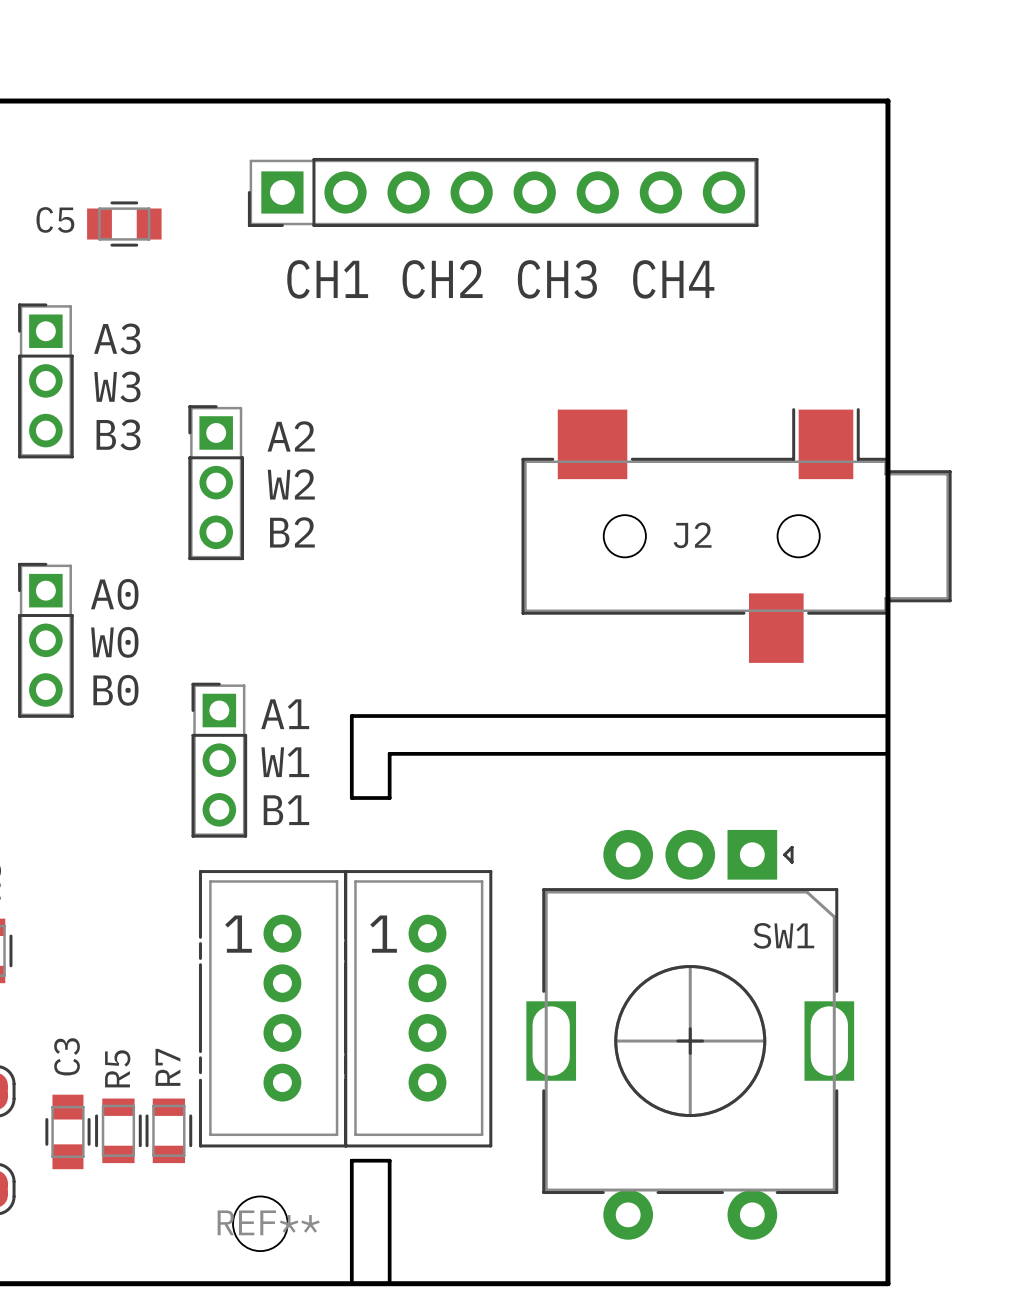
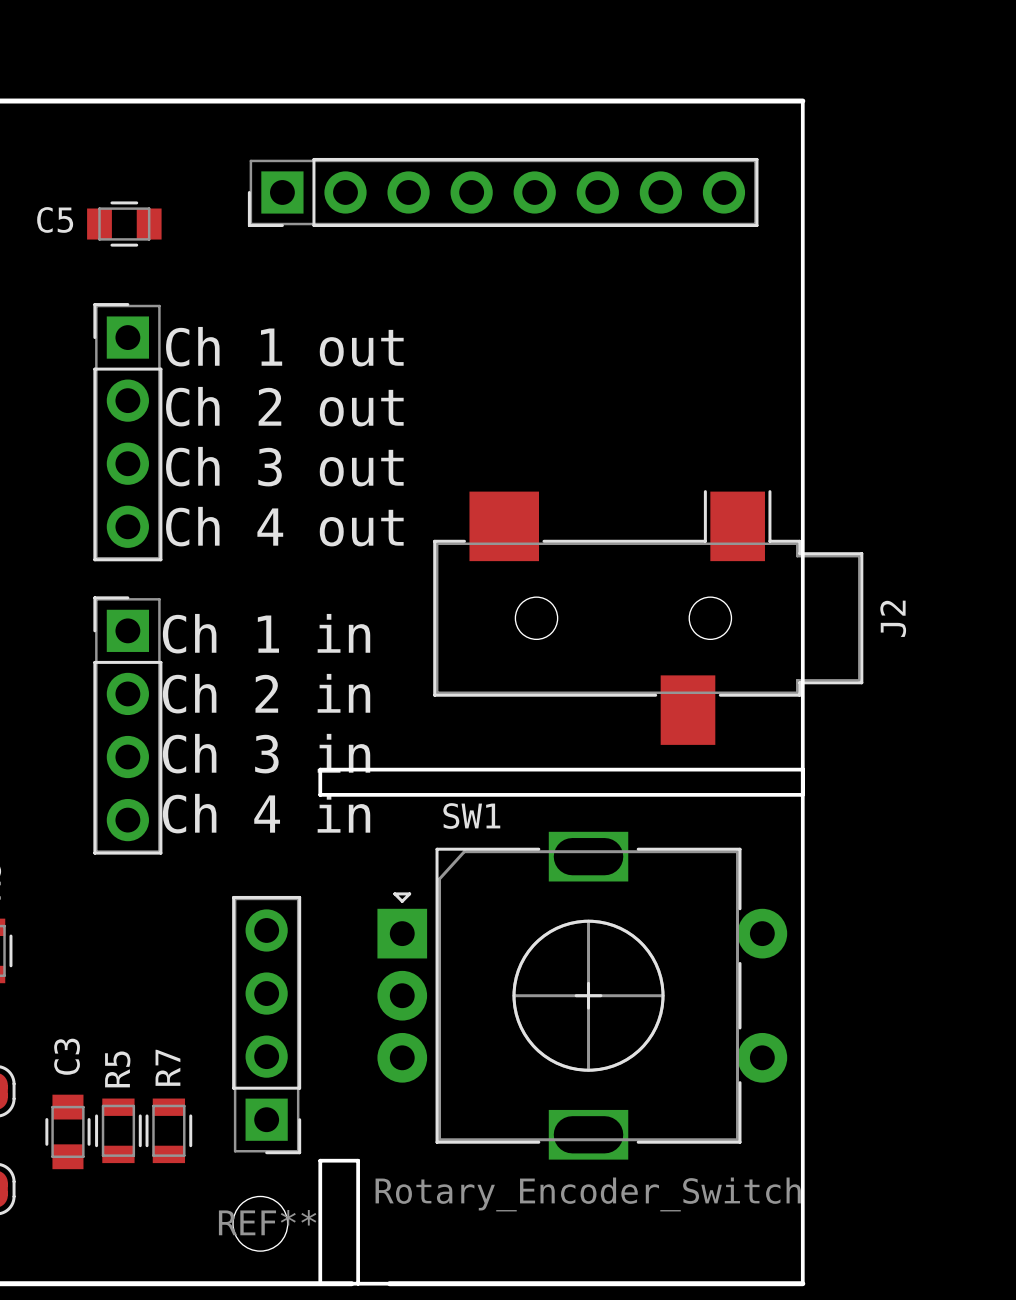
board edge: (802, 101) (887, 101) (887, 1283) (802, 1283) -> (802, 101) (802, 1283)
text: CH1 CH2 CH3 CH4 (500, 279) -> none
text: A3 (117, 338) -> none
text: none -> Ch 1 out (284, 346)
part: (45, 380) -> none
text: W3 (117, 386) -> none
text: none -> Ch 2 out (284, 406)
part: none -> (127, 432)
text: B3 (118, 434) -> none
text: A2 (291, 436) -> none
text: none -> Ch 3 out (284, 466)
part: (216, 482) -> none
text: W2 (291, 484) -> none
text: none -> Ch 4 out (284, 526)
text: B2 (292, 532) -> none
J2 name rotation: 0° (692, 535) -> 90° counterclockwise (893, 618)
J2 name position: J2 (692, 535) -> J2 (893, 618)
J2 position: (736, 535) -> (648, 617)
text: A0 (114, 594) -> none
text: none -> Ch 1 in (266, 633)
part: (45, 640) -> none
text: W0 (114, 642) -> none
text: B0 (115, 690) -> none
text: none -> Ch 2 in (266, 693)
text: A1 (285, 714) -> none
board edge: (351, 716) (887, 716) (887, 753) (389, 753) (389, 798) (351, 798) (351, 716) -> none
part: none -> (127, 725)
text: none -> Ch 3 in (266, 753)
part: (219, 760) -> none
text: W1 (285, 762) -> none
board edge: none -> (802, 769) (320, 769) (320, 794) (802, 794)
text: B1 (286, 810) -> none
text: none -> Ch 4 in (266, 813)
part footprint: [198, 870, 348, 1148] -> [232, 895, 302, 1155]
SW1 name position: SW1 (783, 935) -> SW1 (471, 816)
part: (418, 1008) -> none
SW1 rotation: 0° (690, 1034) -> 90° counterclockwise (582, 995)
board edge: (351, 1160) (351, 1283) (389, 1283) (389, 1160) (358, 1160) -> (358, 1283) (358, 1160)
board edge: none -> (351, 1160) (320, 1160) (320, 1283)
SW1 value: none -> Rotary_Encoder_Switch (588, 1194)

